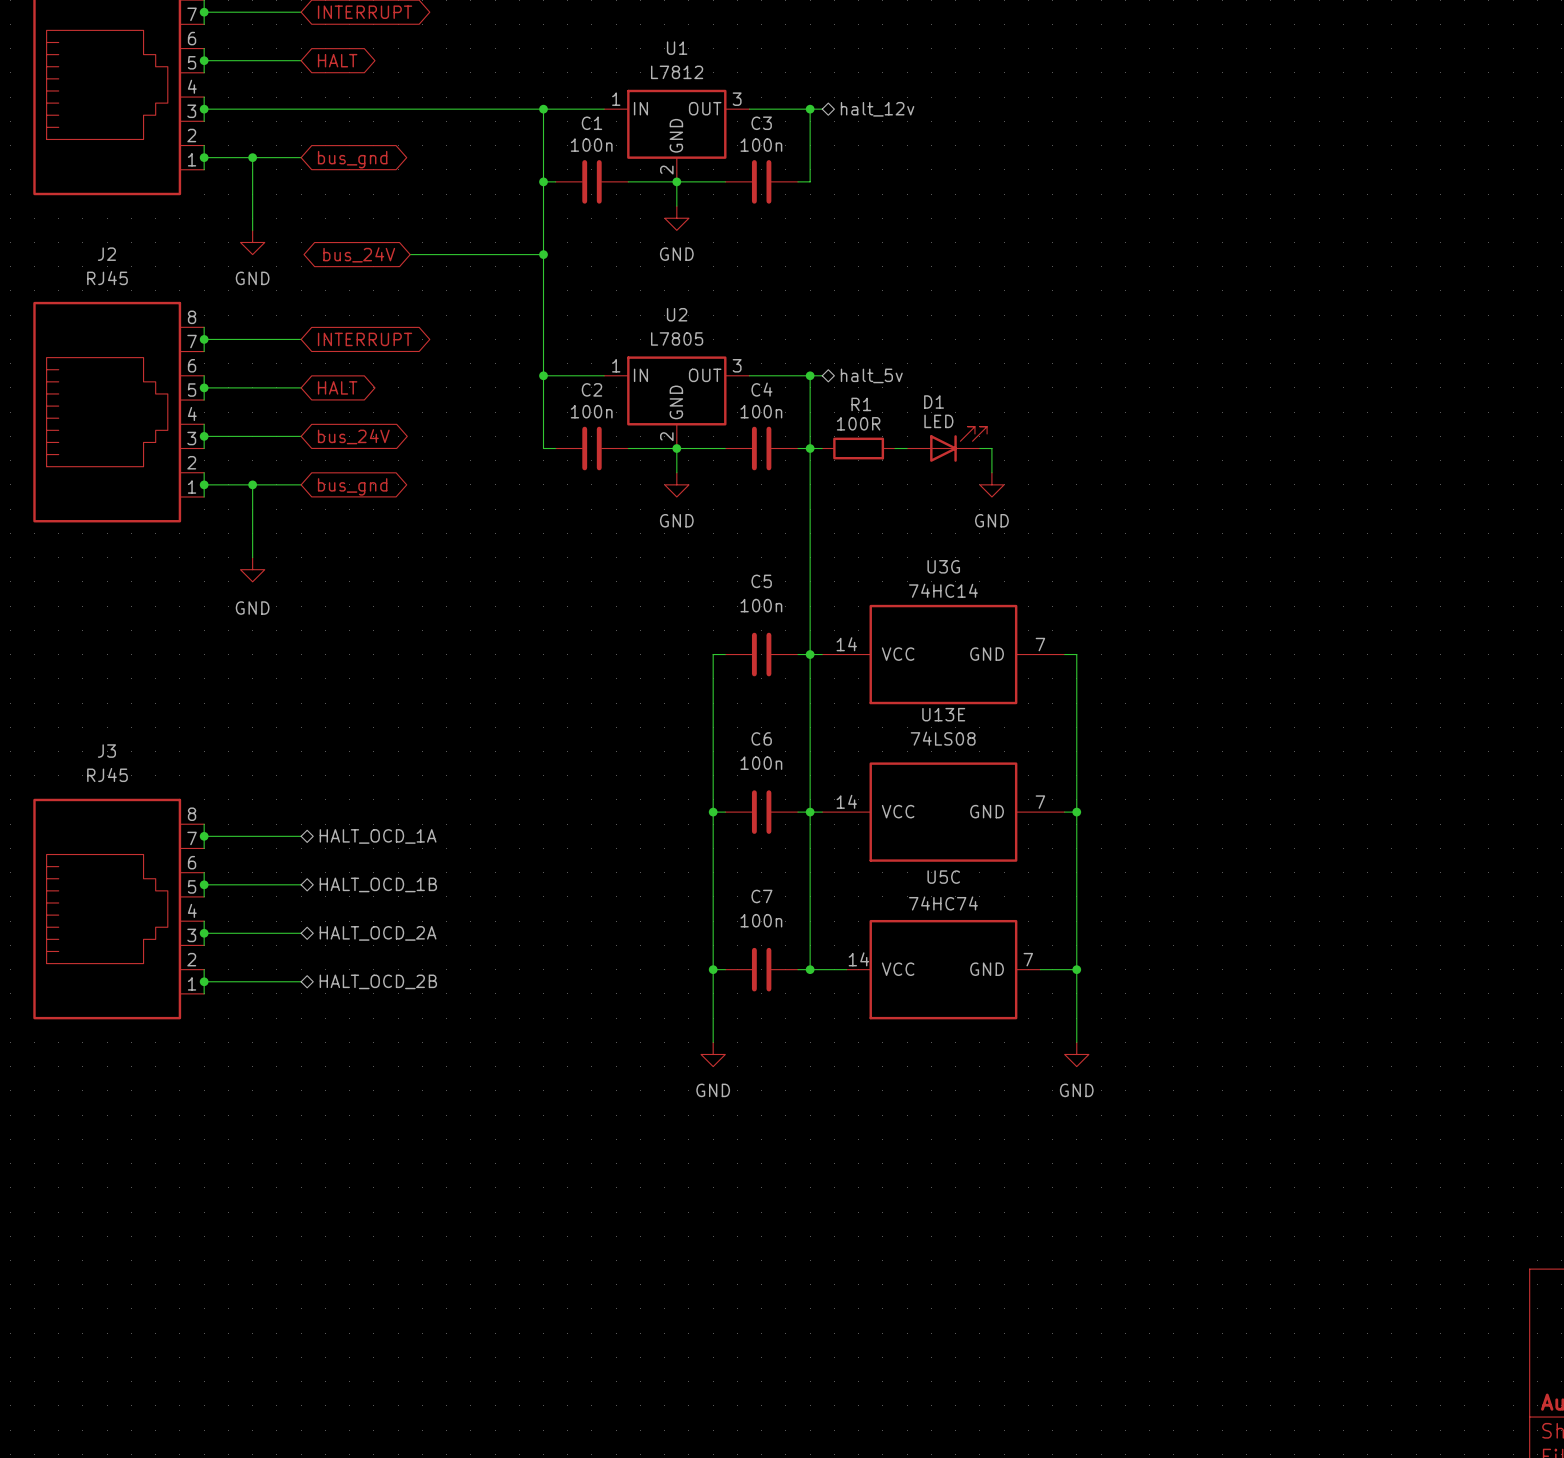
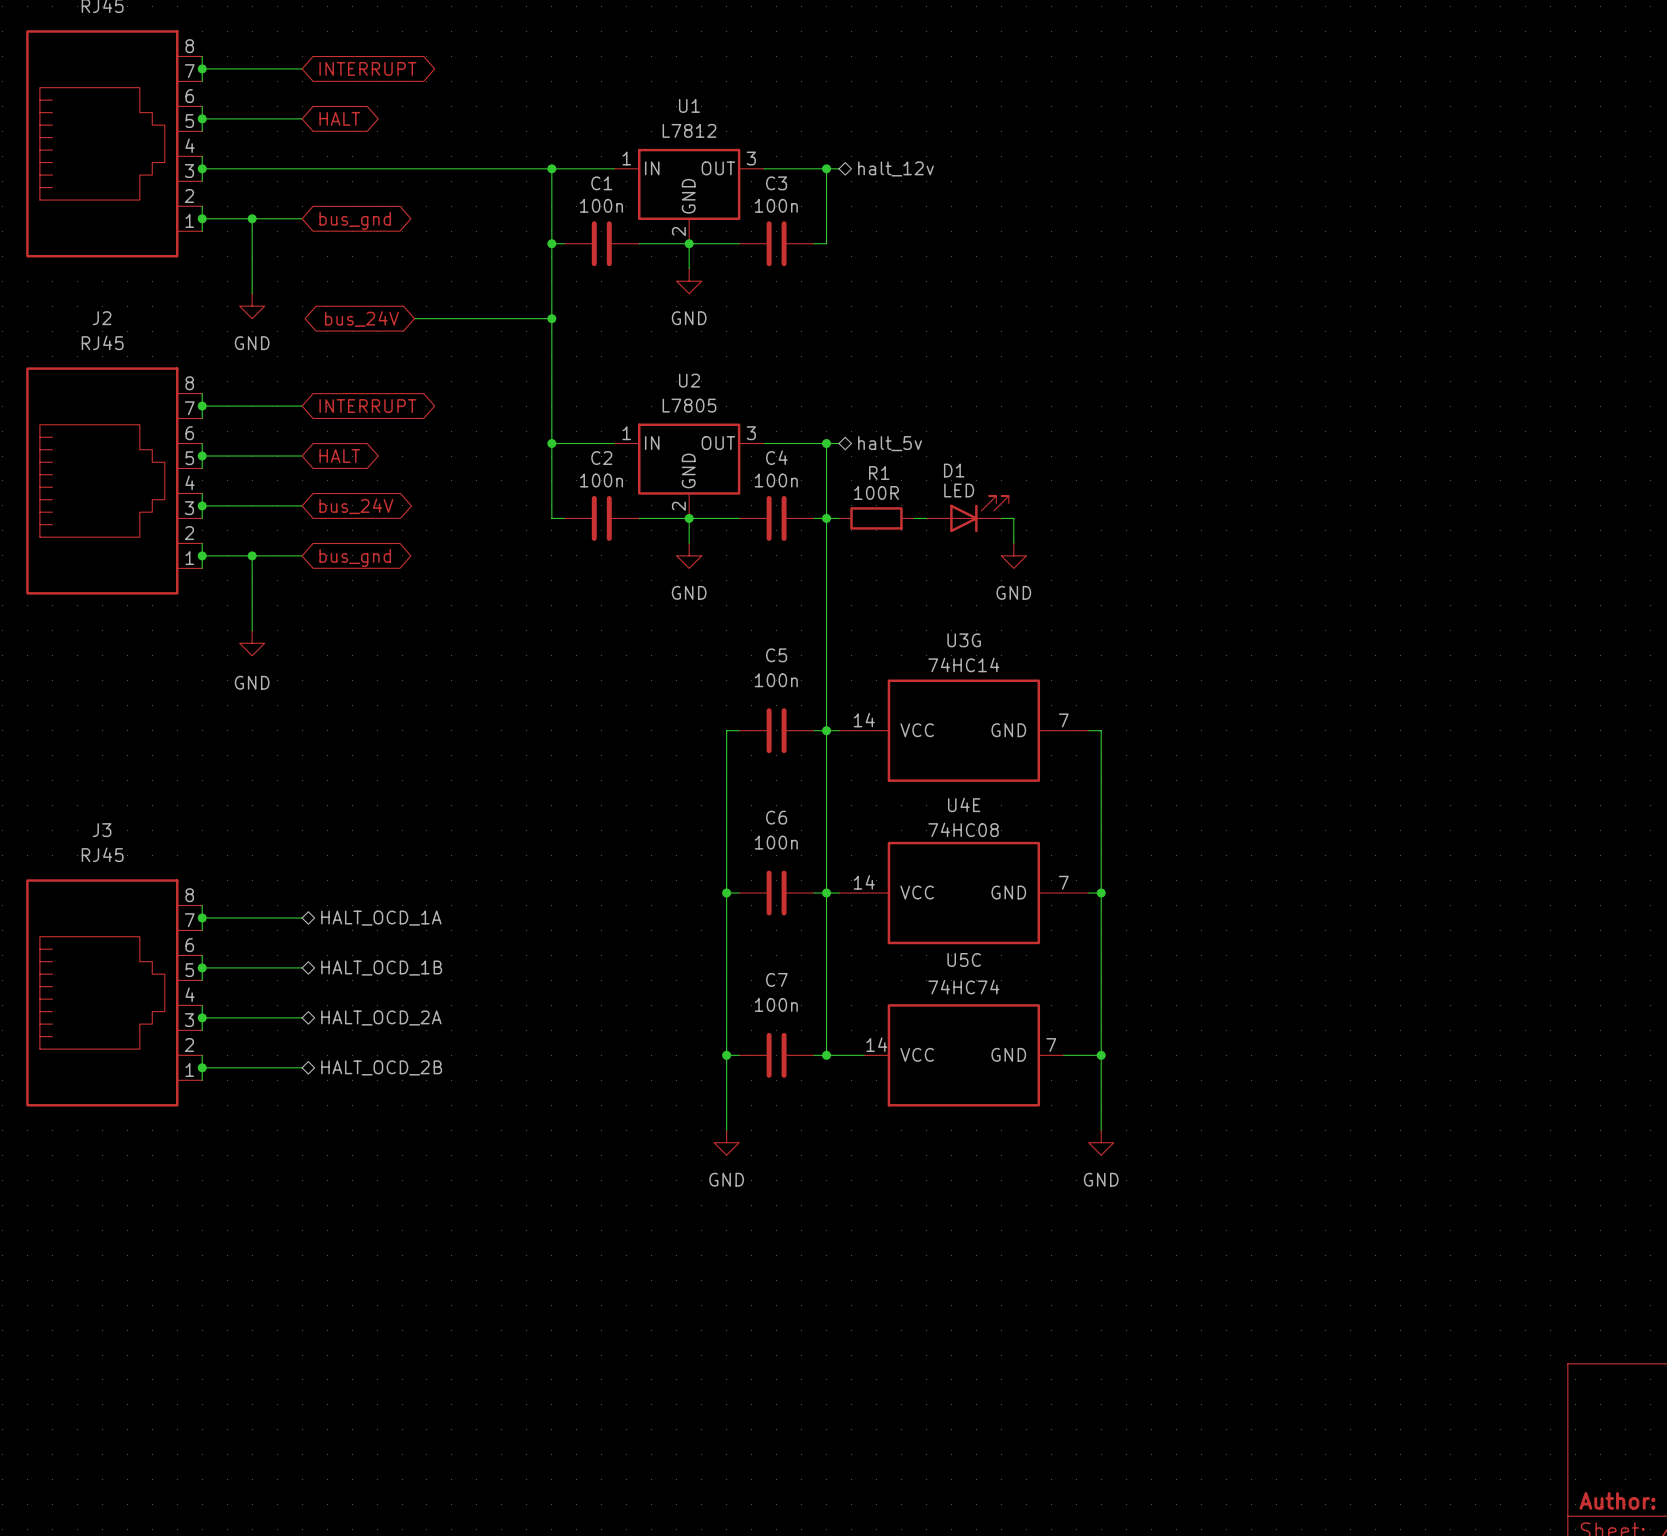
U13E name: U13E (943, 714) -> U4E (964, 804)
U13E value: 74LS08 (943, 738) -> 74HC08 (963, 829)

